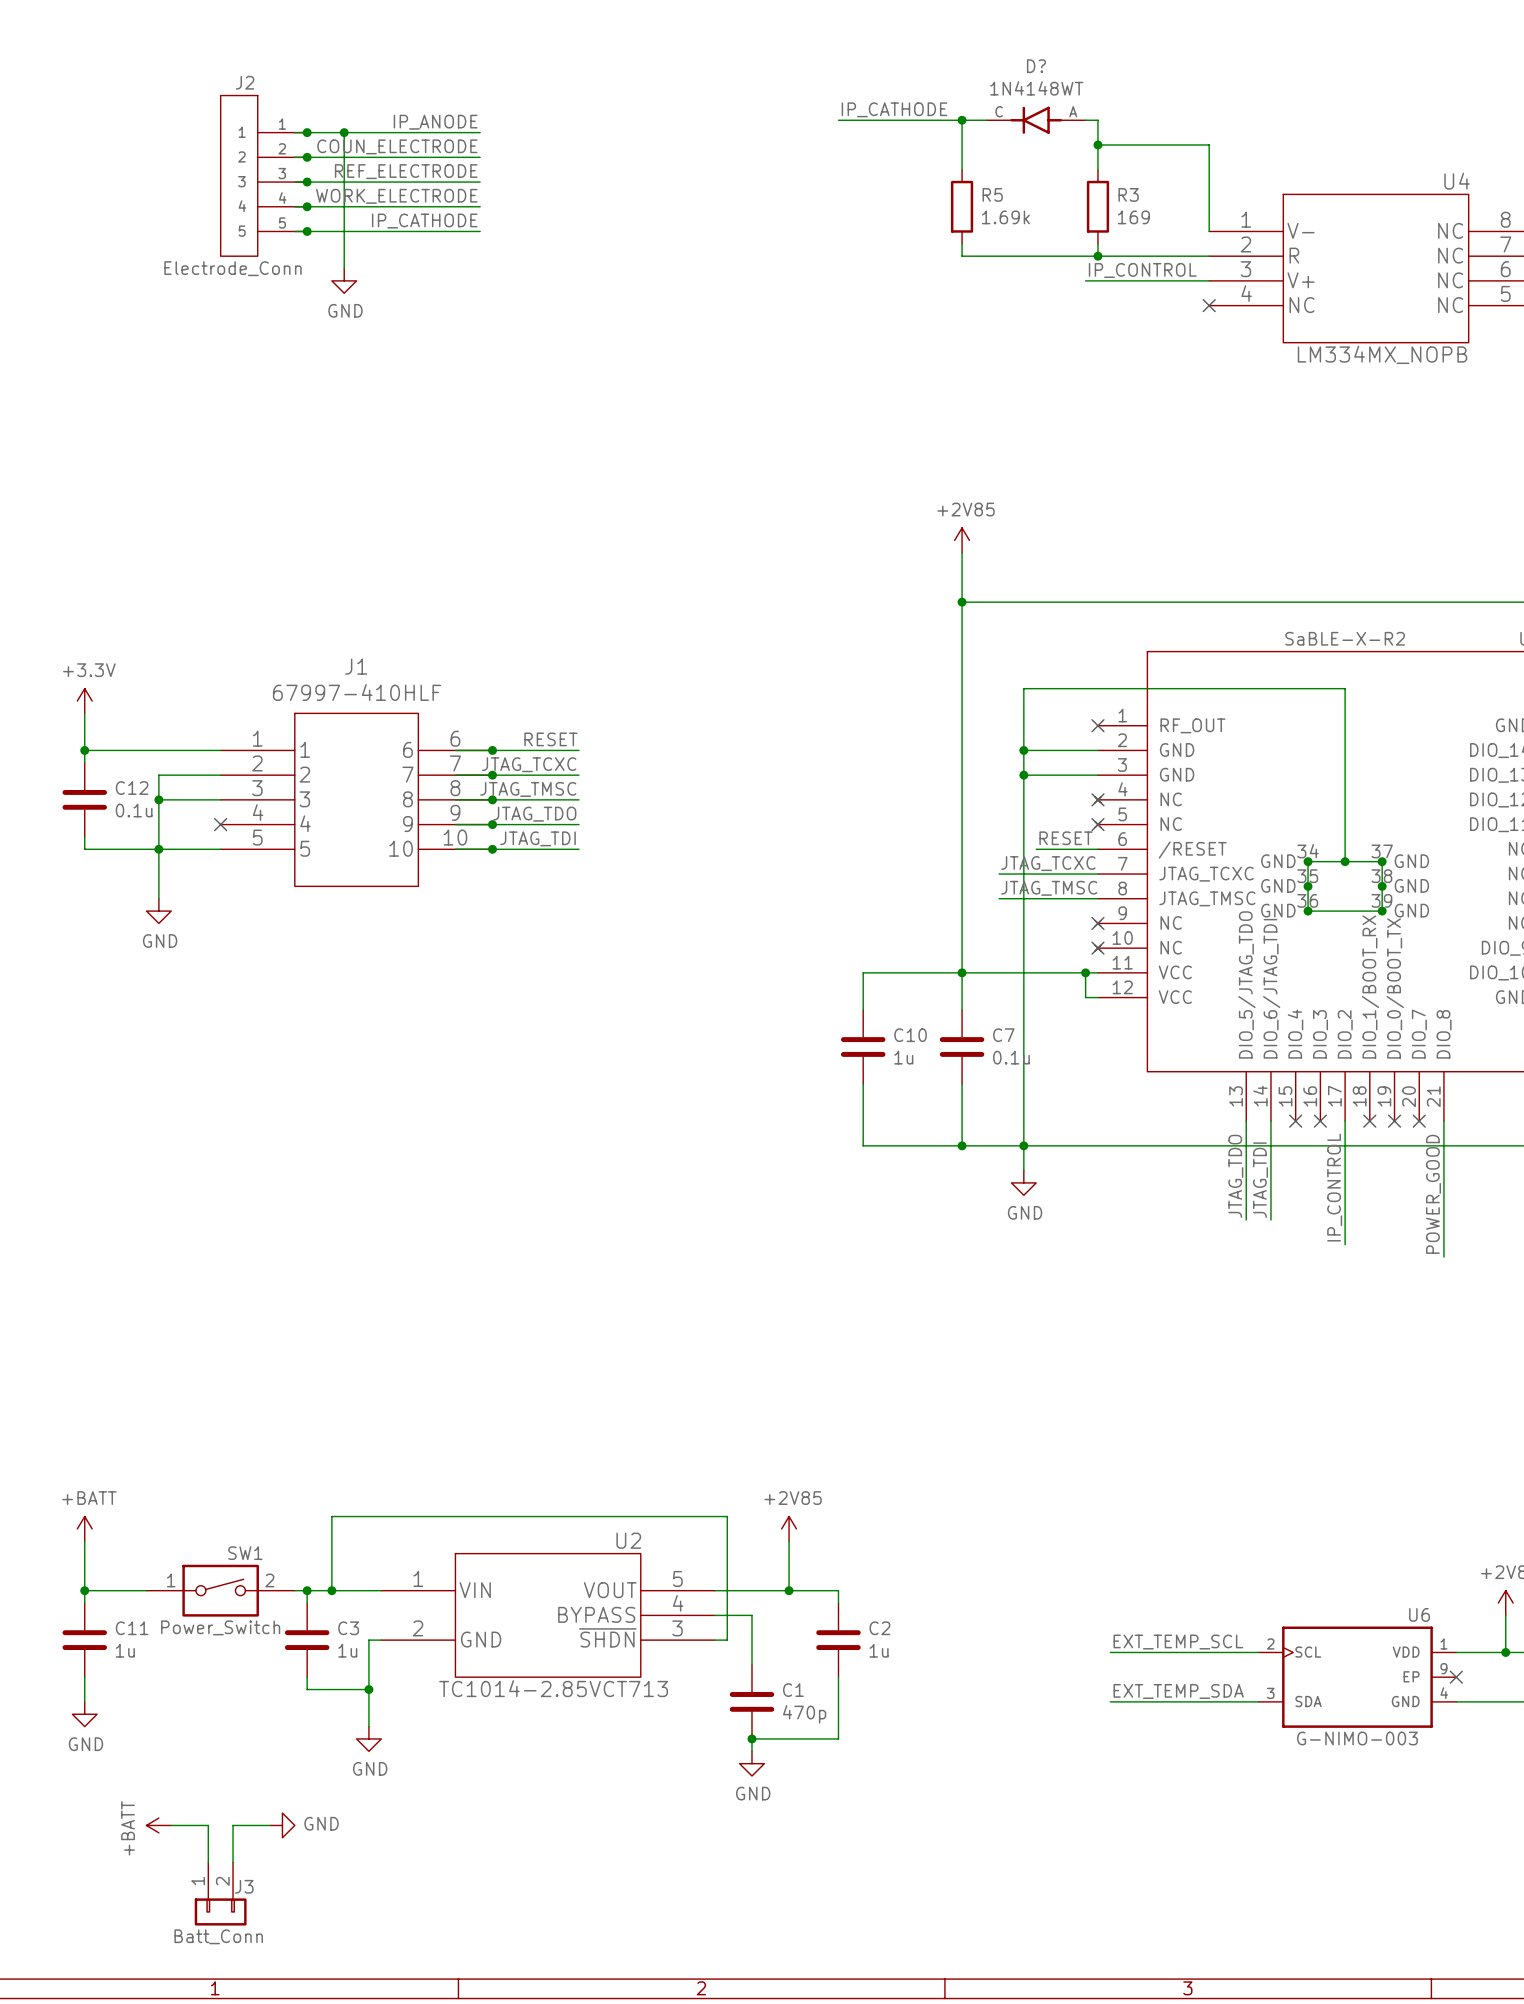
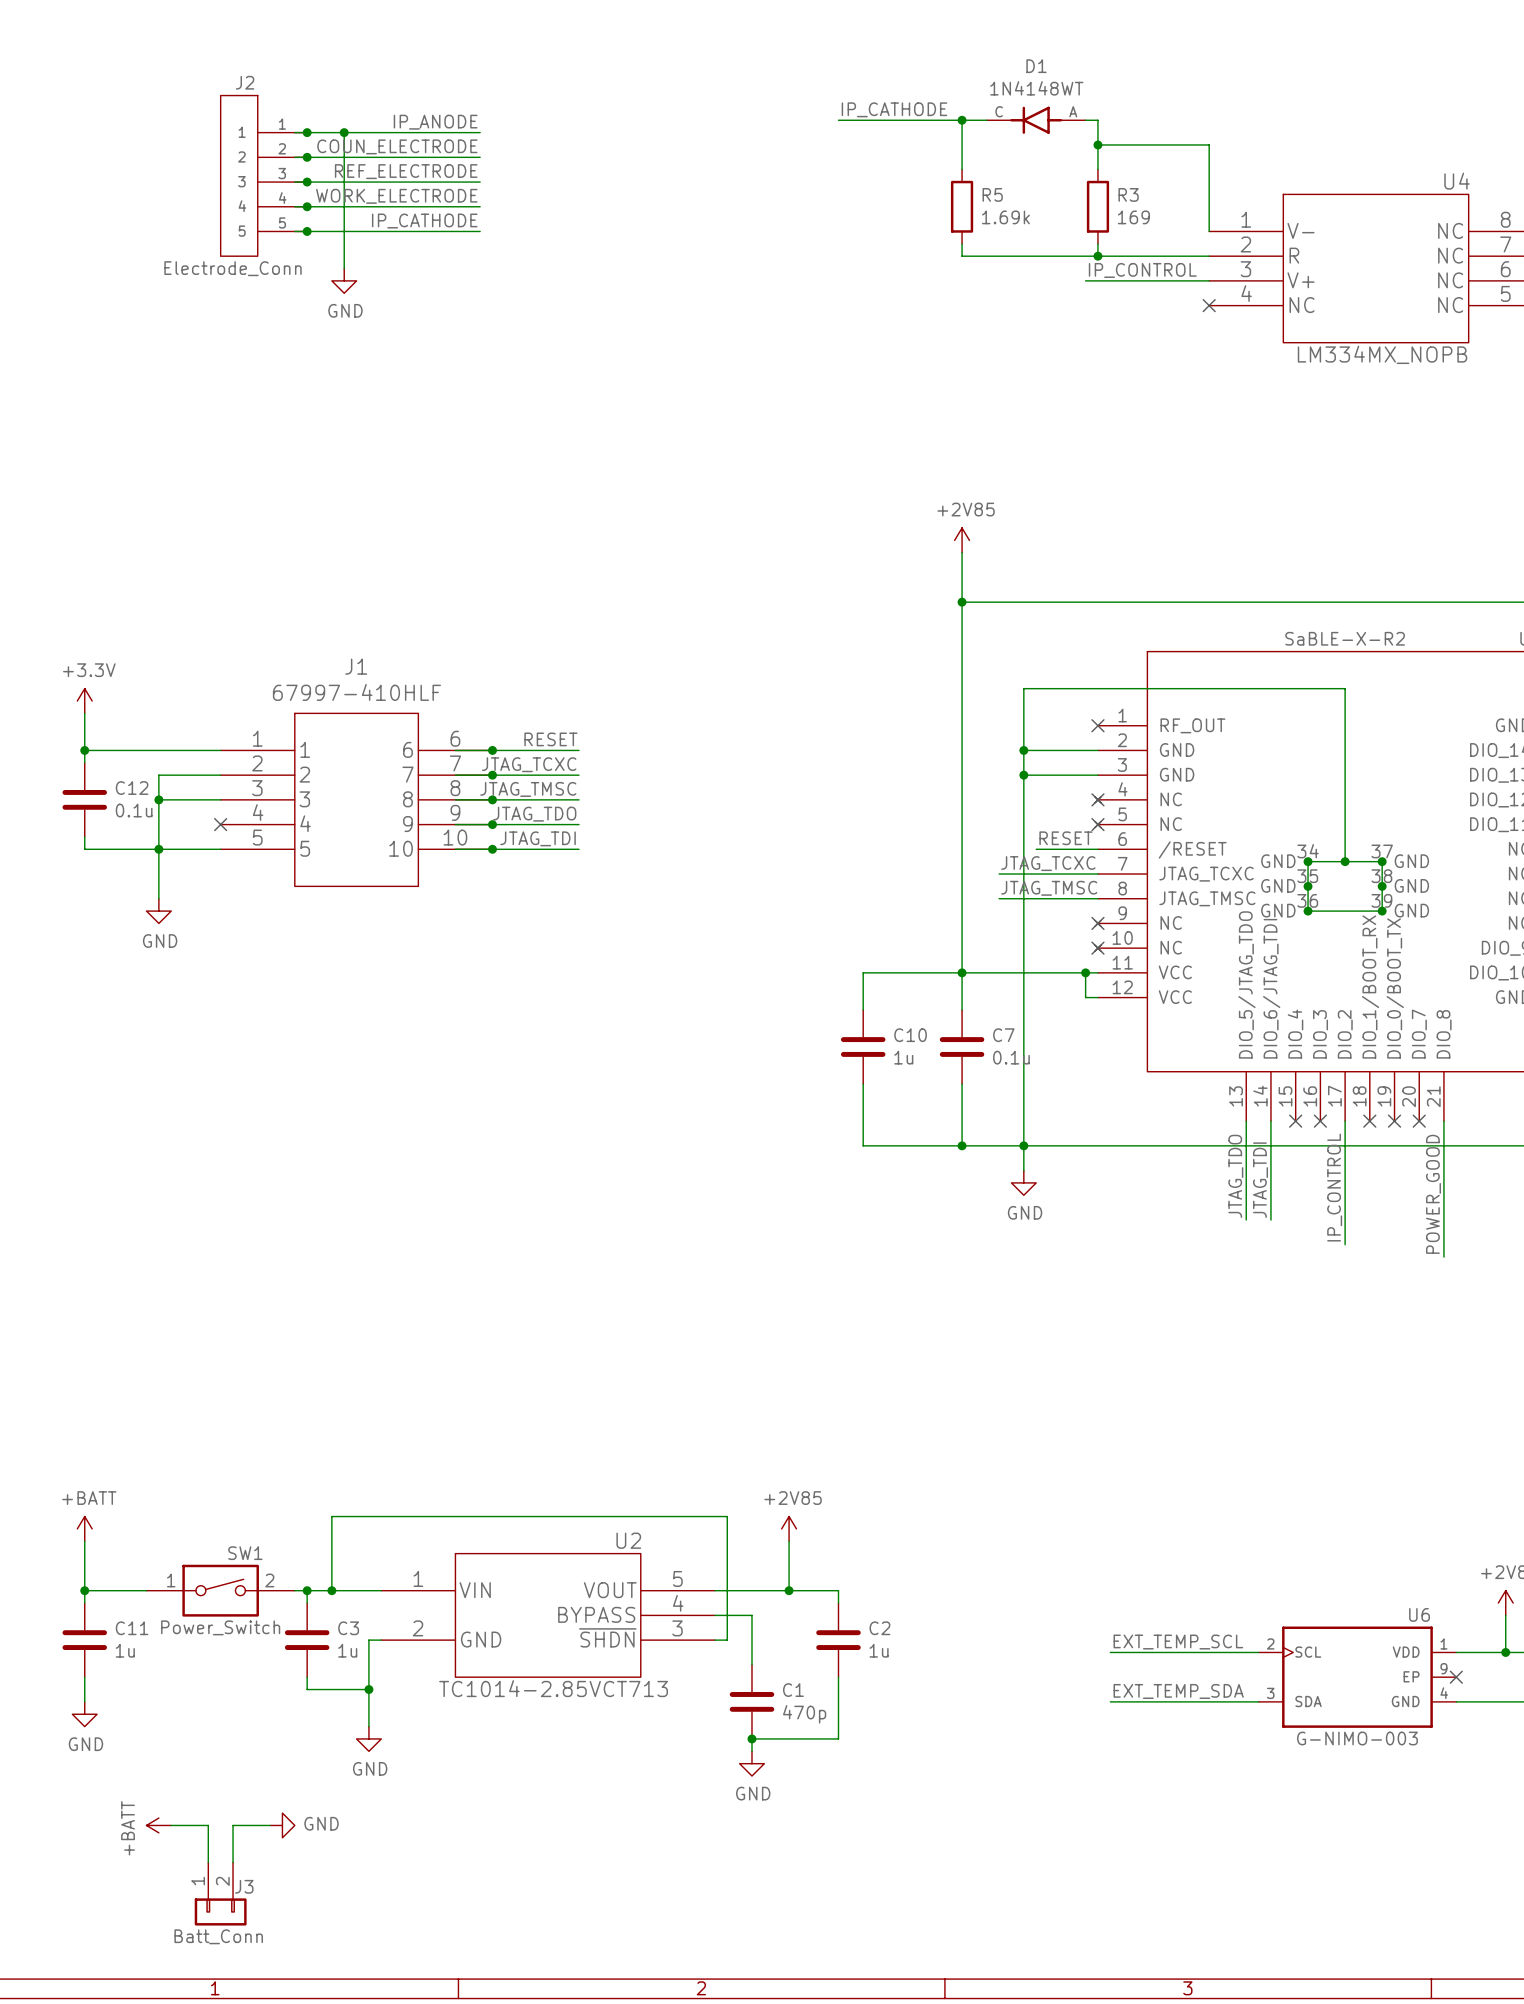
D? name: D? (1036, 66) -> D1 (1036, 66)

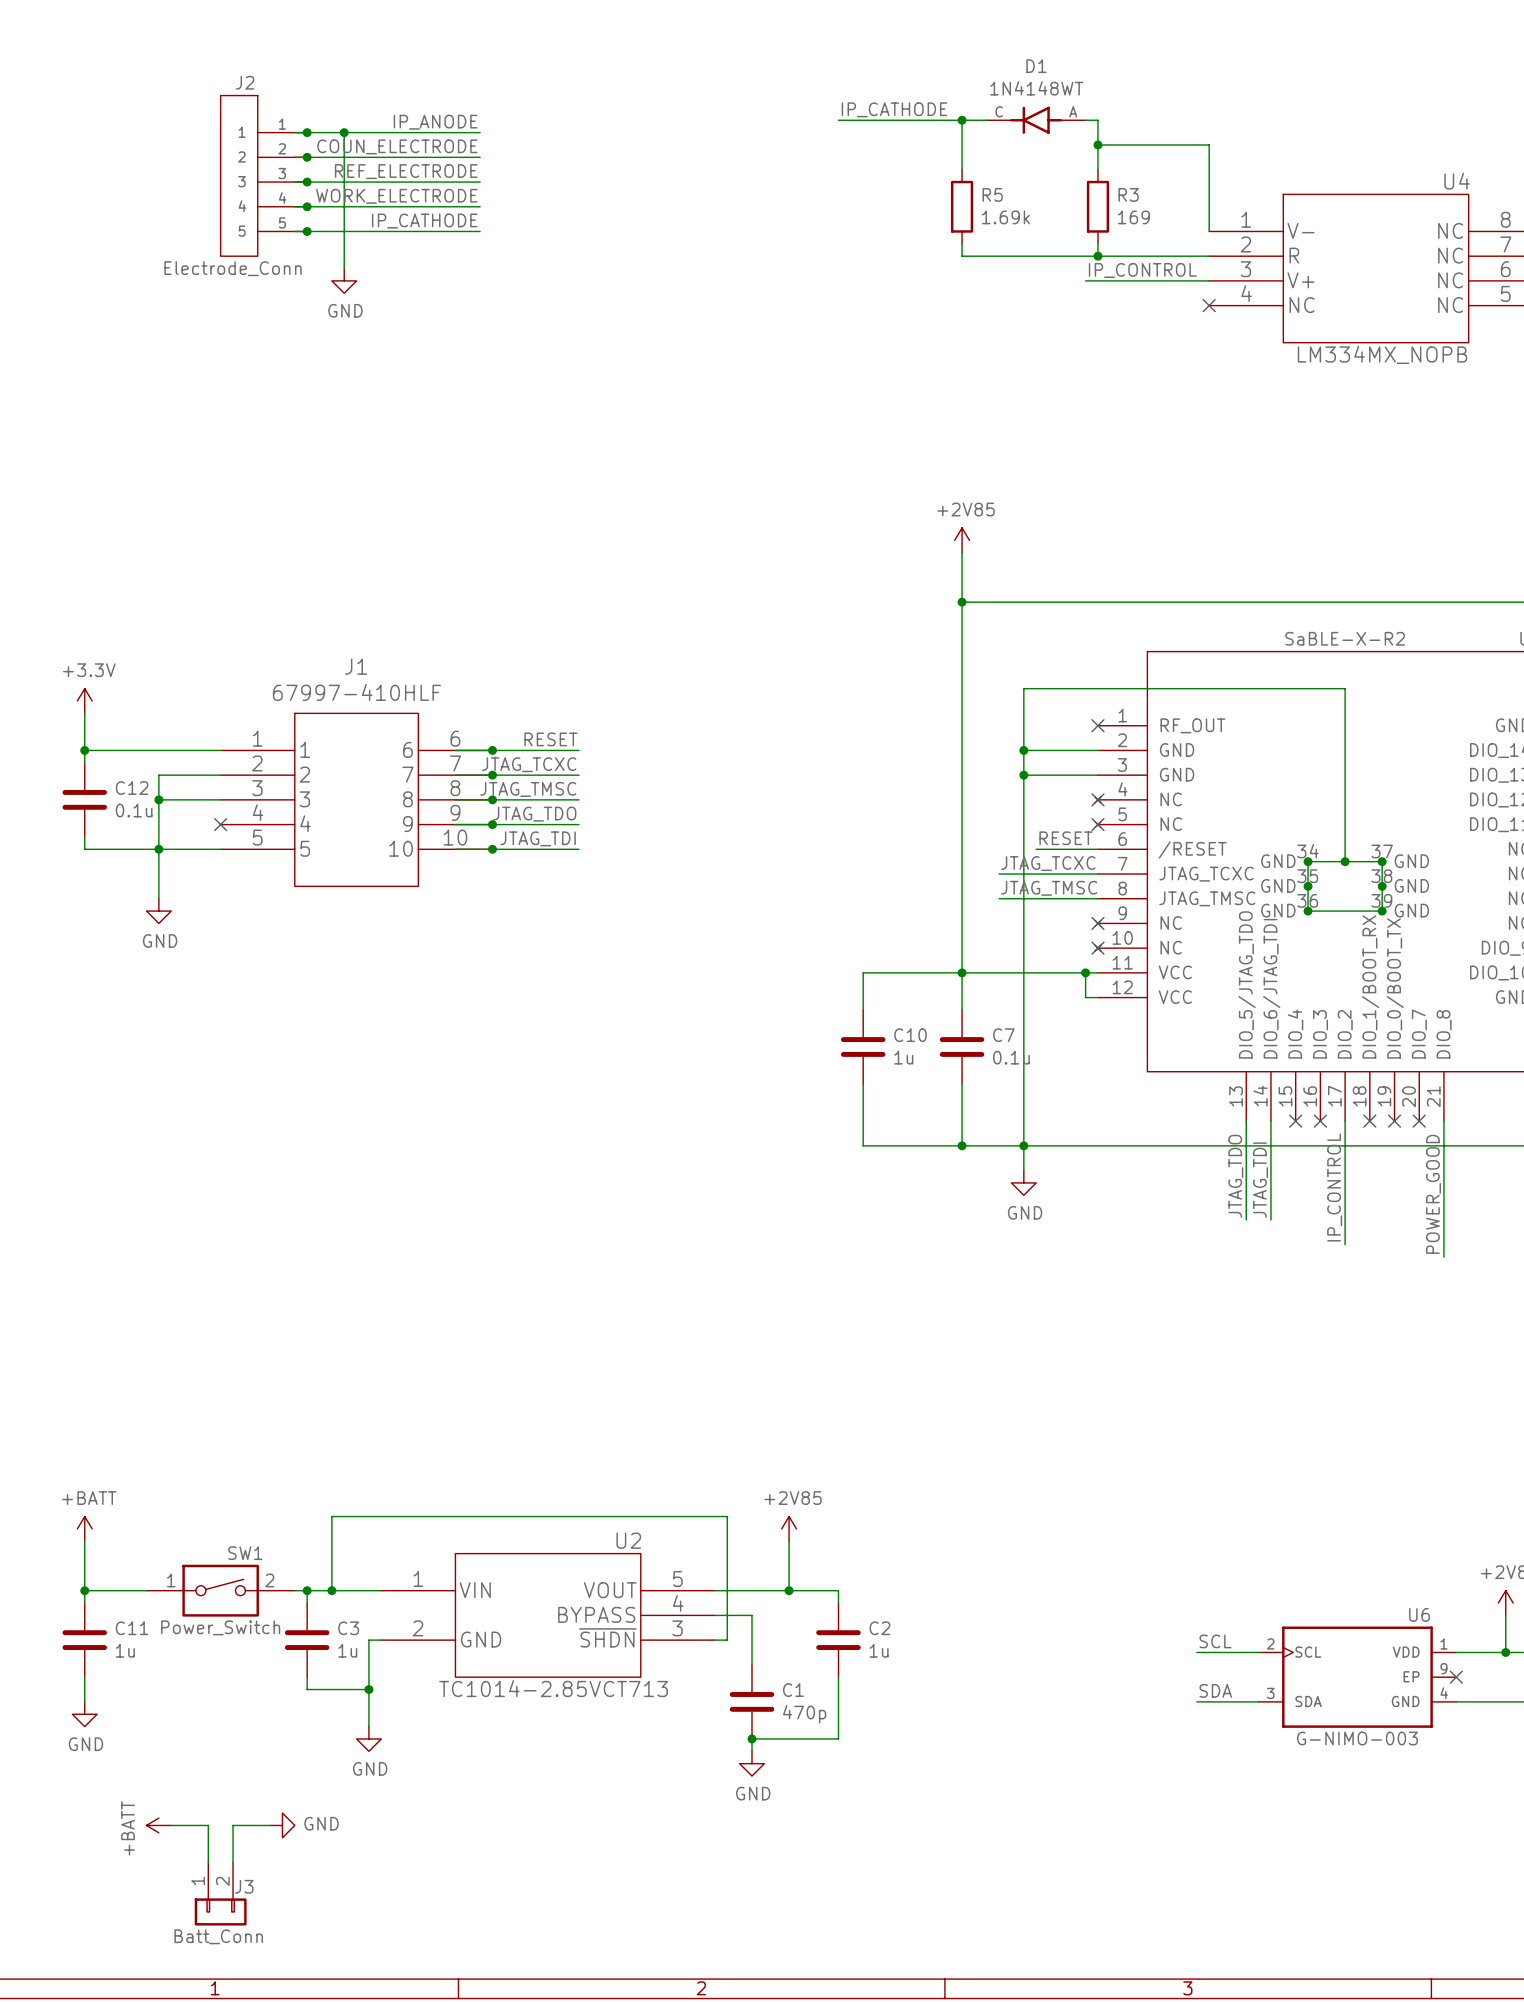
label: none -> SCL (1215, 1641)
label: EXT_TEMP_SCL (1178, 1642) -> none
wire: (1110, 1652) (1196, 1652) -> none
label: none -> SDA (1215, 1690)
label: EXT_TEMP_SDA (1178, 1691) -> none
wire: (1110, 1701) (1196, 1701) -> none

